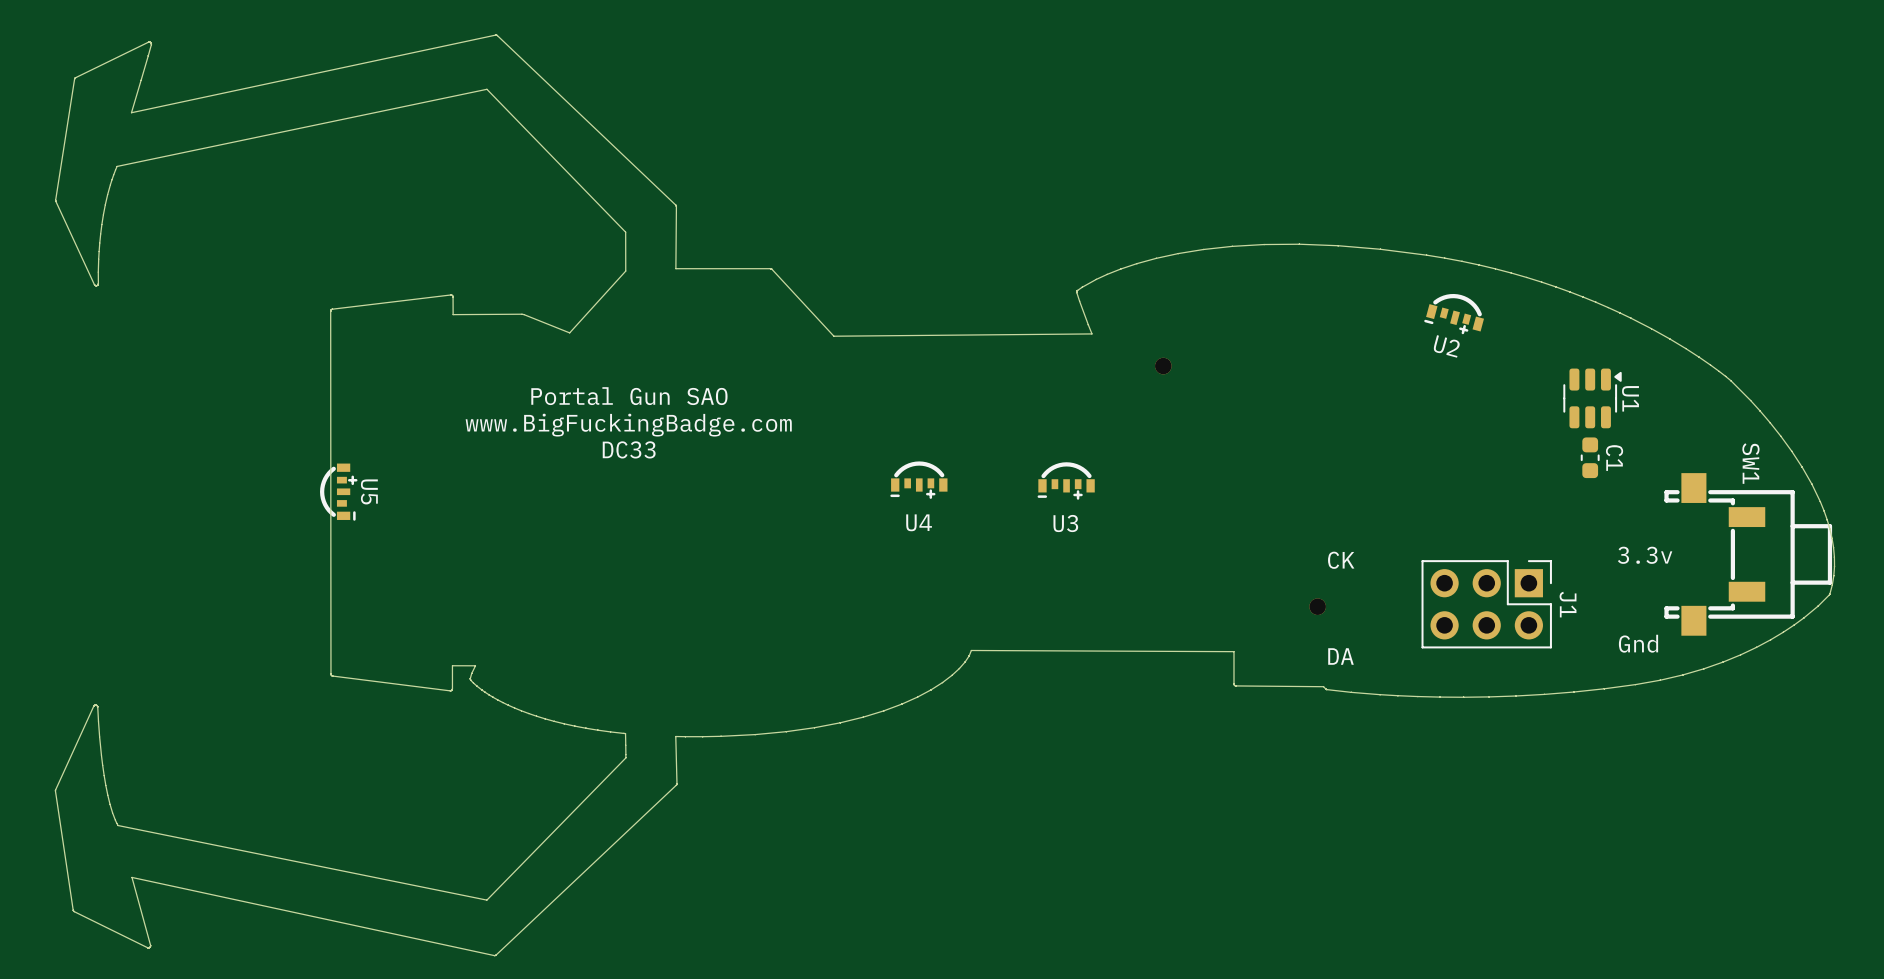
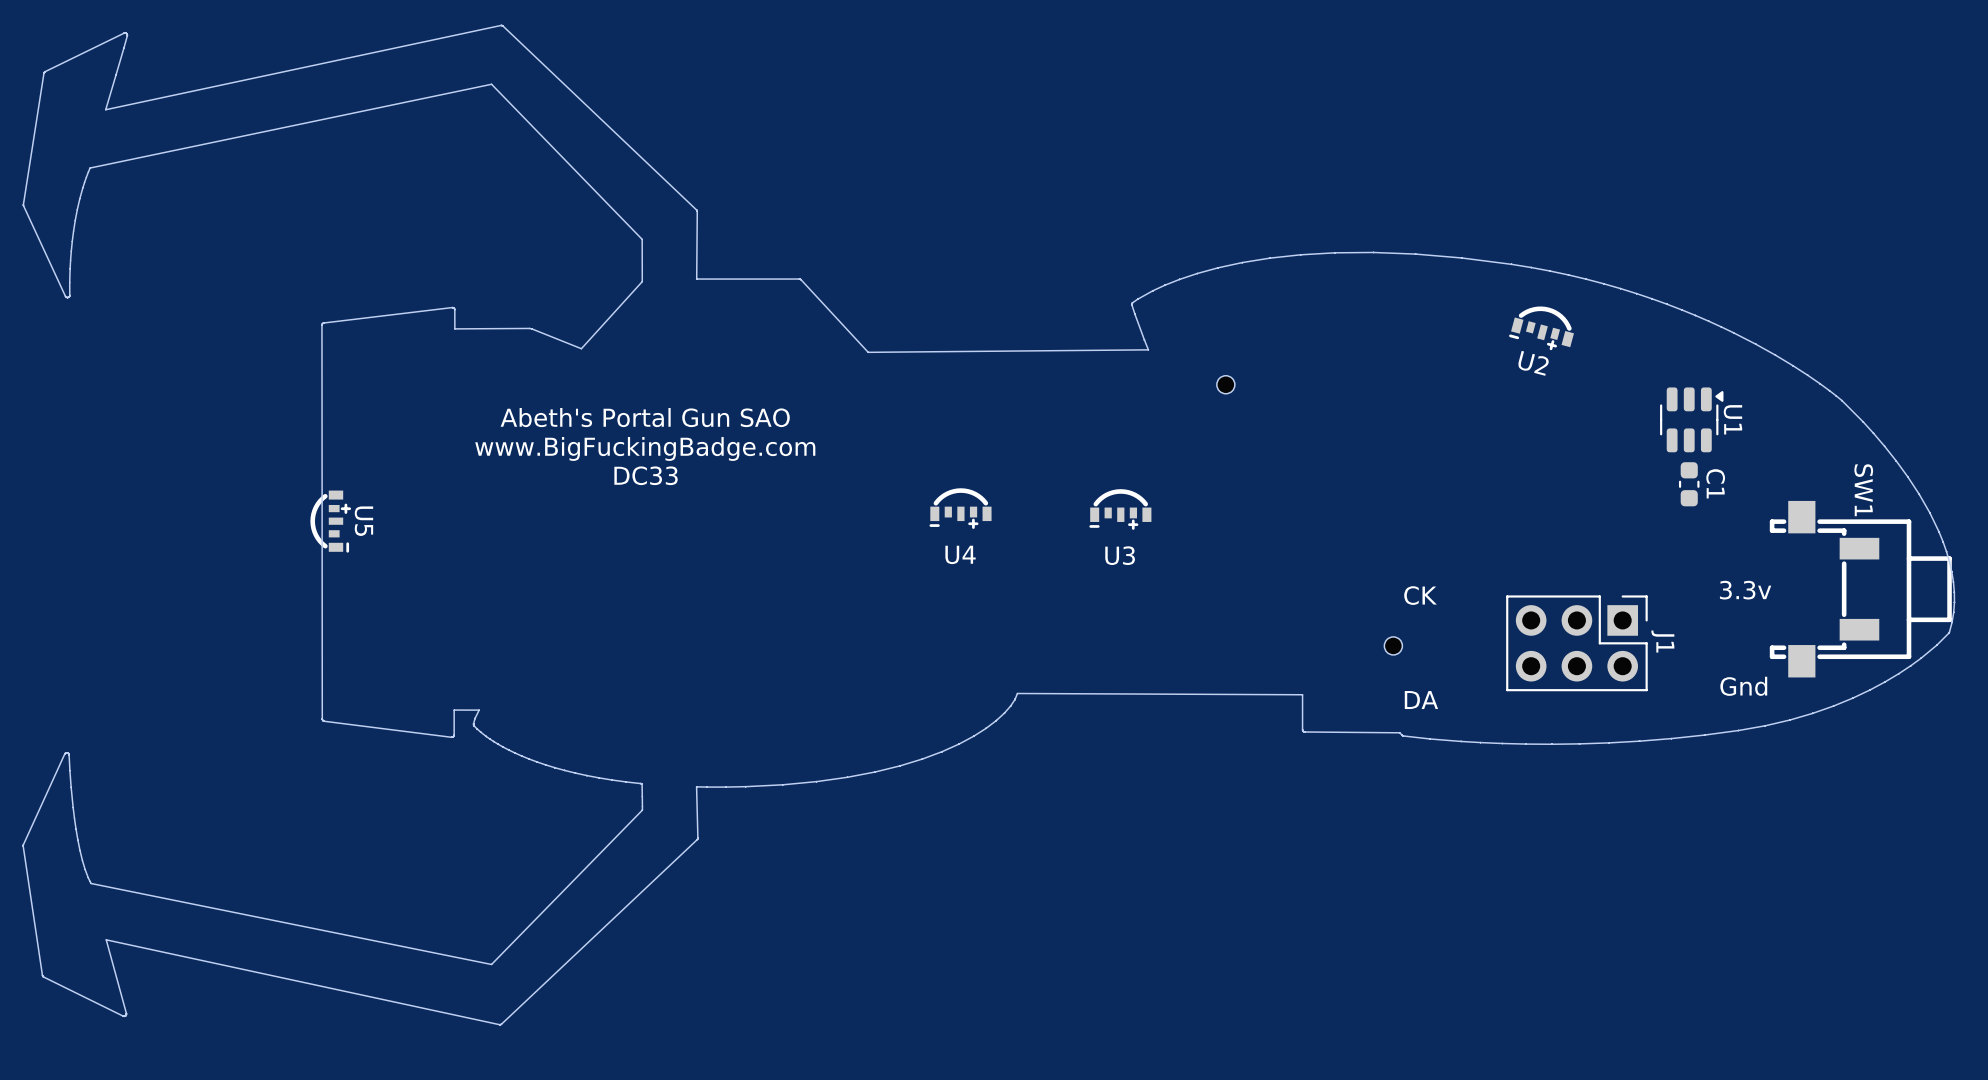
part footprint: [1155, 357, 1172, 375] -> [1216, 375, 1235, 394]
text: Portal Gun SAO (629, 396) -> Abeth's Portal Gun SAO (645, 417)
part footprint: [1309, 598, 1326, 615] -> [1384, 636, 1403, 655]

